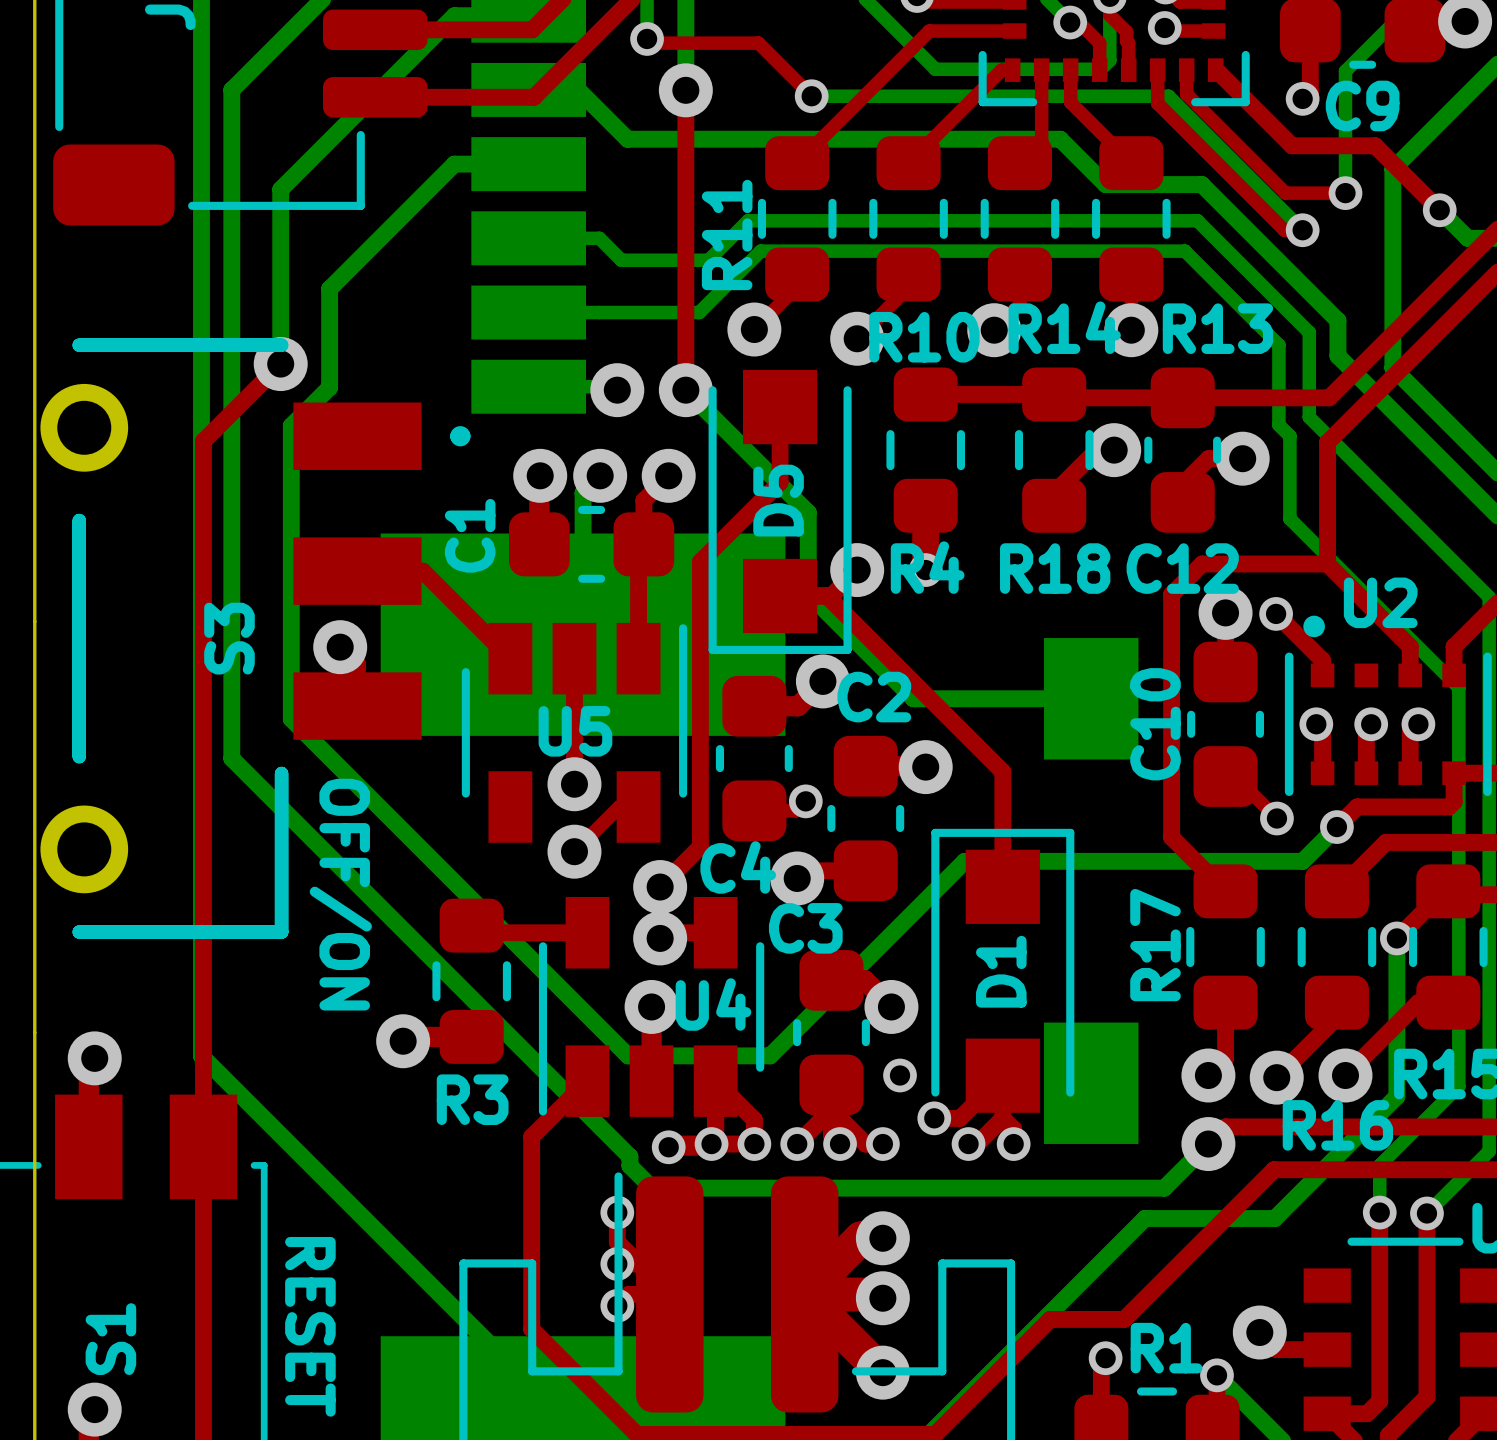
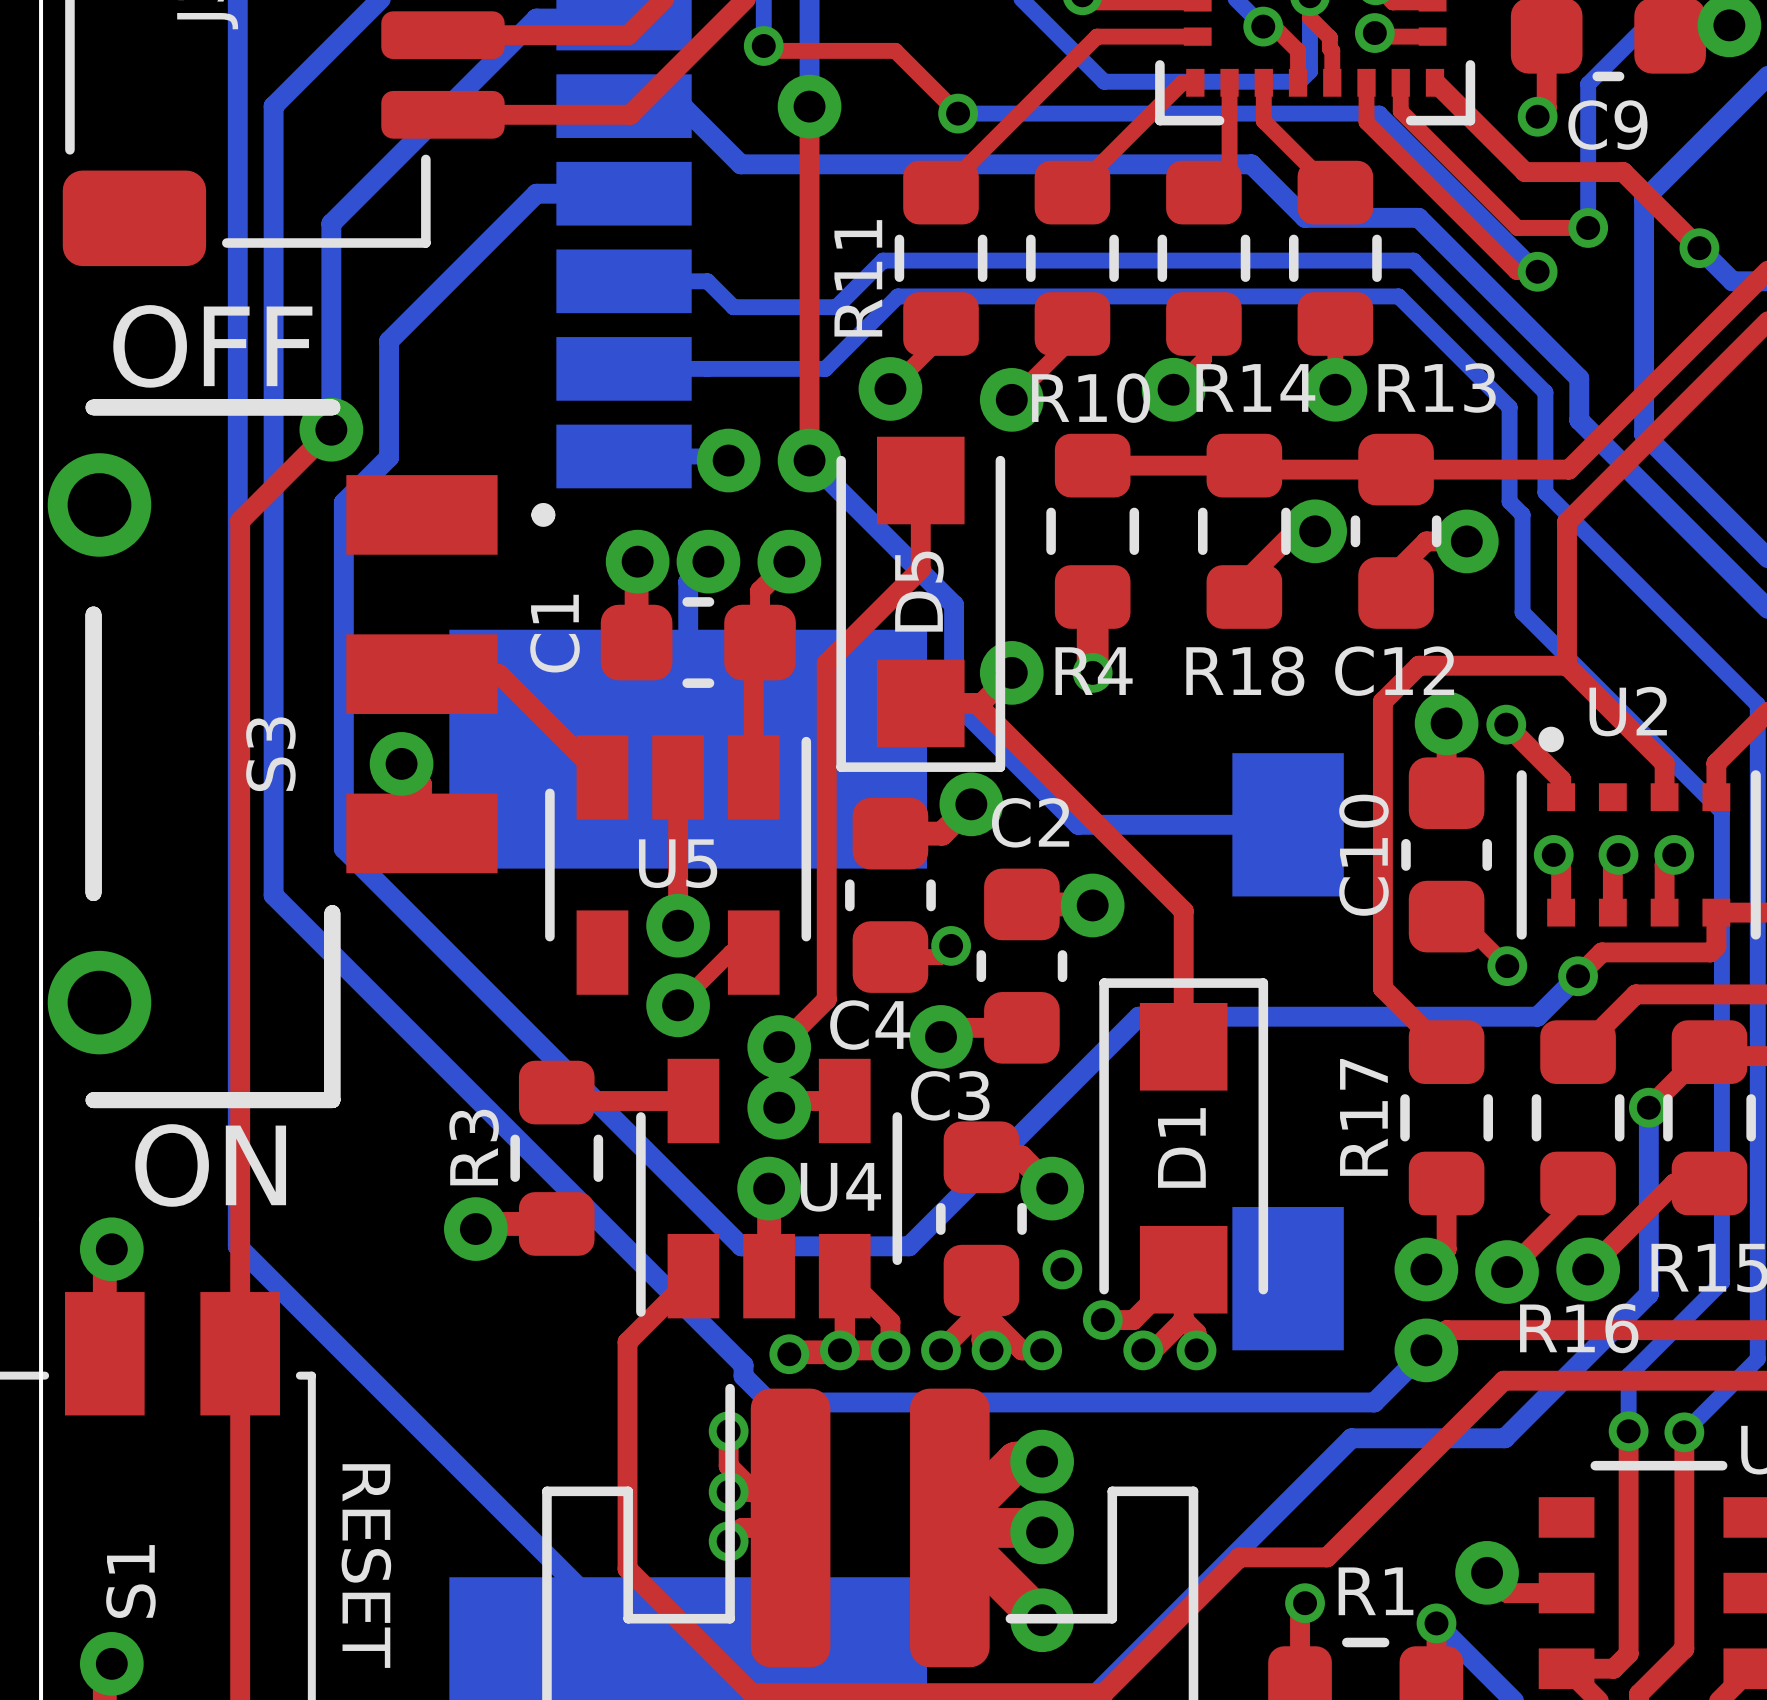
text: none -> OFF (212, 346)
text: OFF/ON (340, 894) -> none
text: none -> ON (210, 1165)
R3 name rotation: 0° (472, 1099) -> 90° counterclockwise (474, 1147)
R3 name position: R3 (472, 1099) -> R3 (474, 1147)

